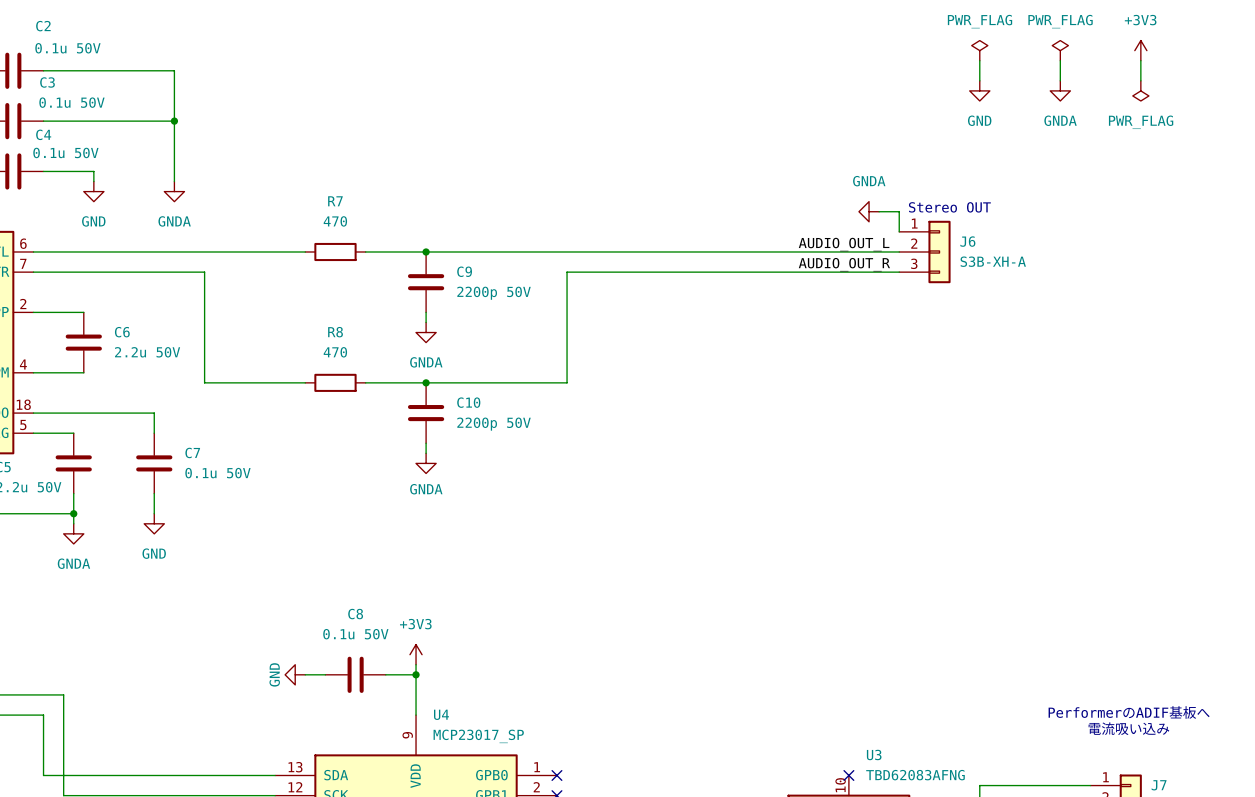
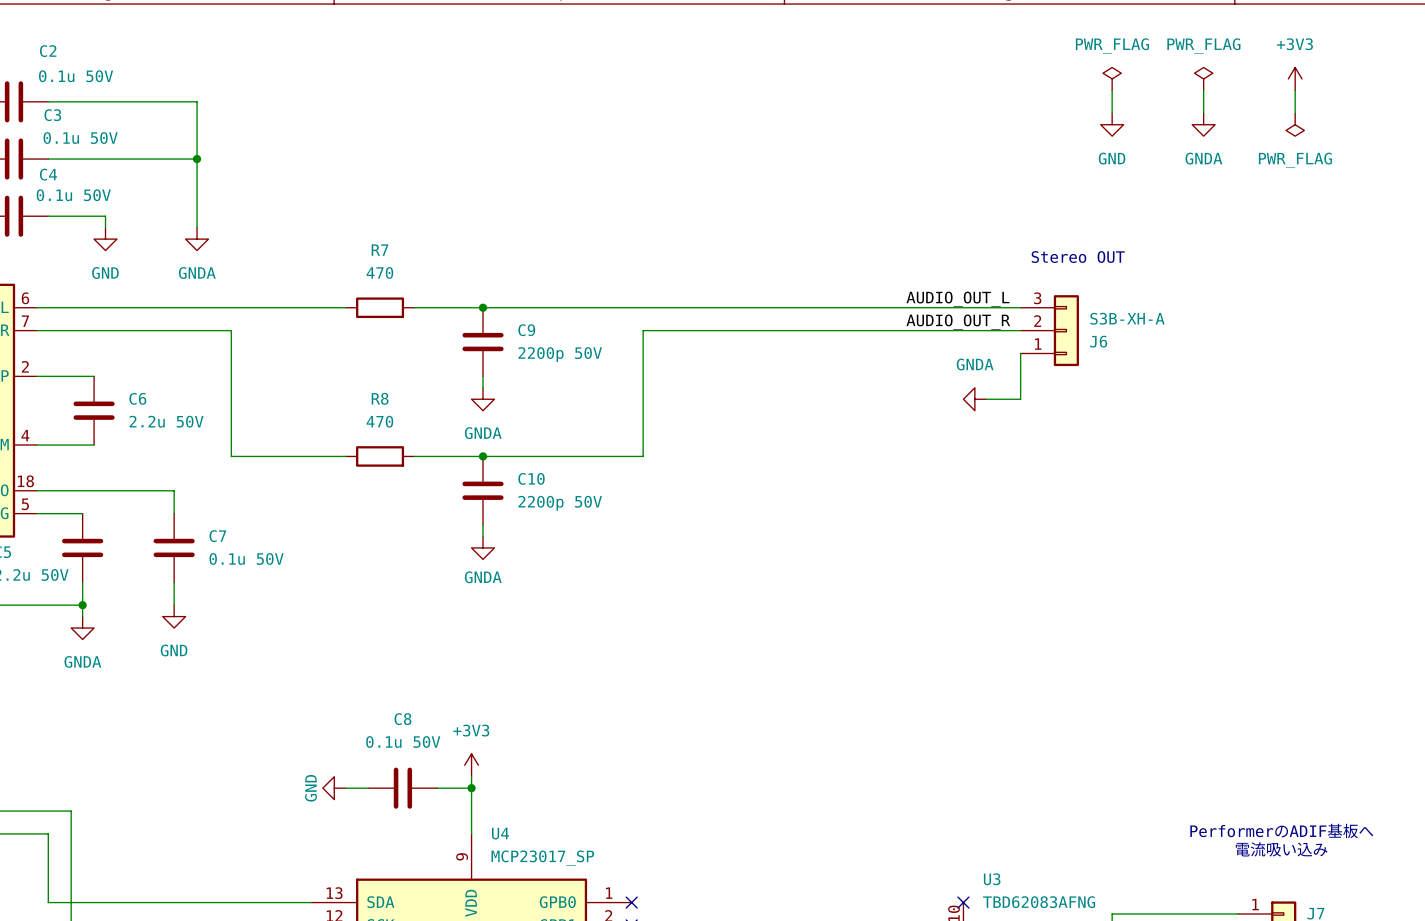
power symbol position: GNDA (869, 211) -> GNDA (974, 399)
wire: (879, 211) (899, 211) (899, 231) -> none
J6 flip: as is (939, 251) -> up-down (1066, 330)
wire: none -> (1020, 353) (1020, 399) (986, 399)

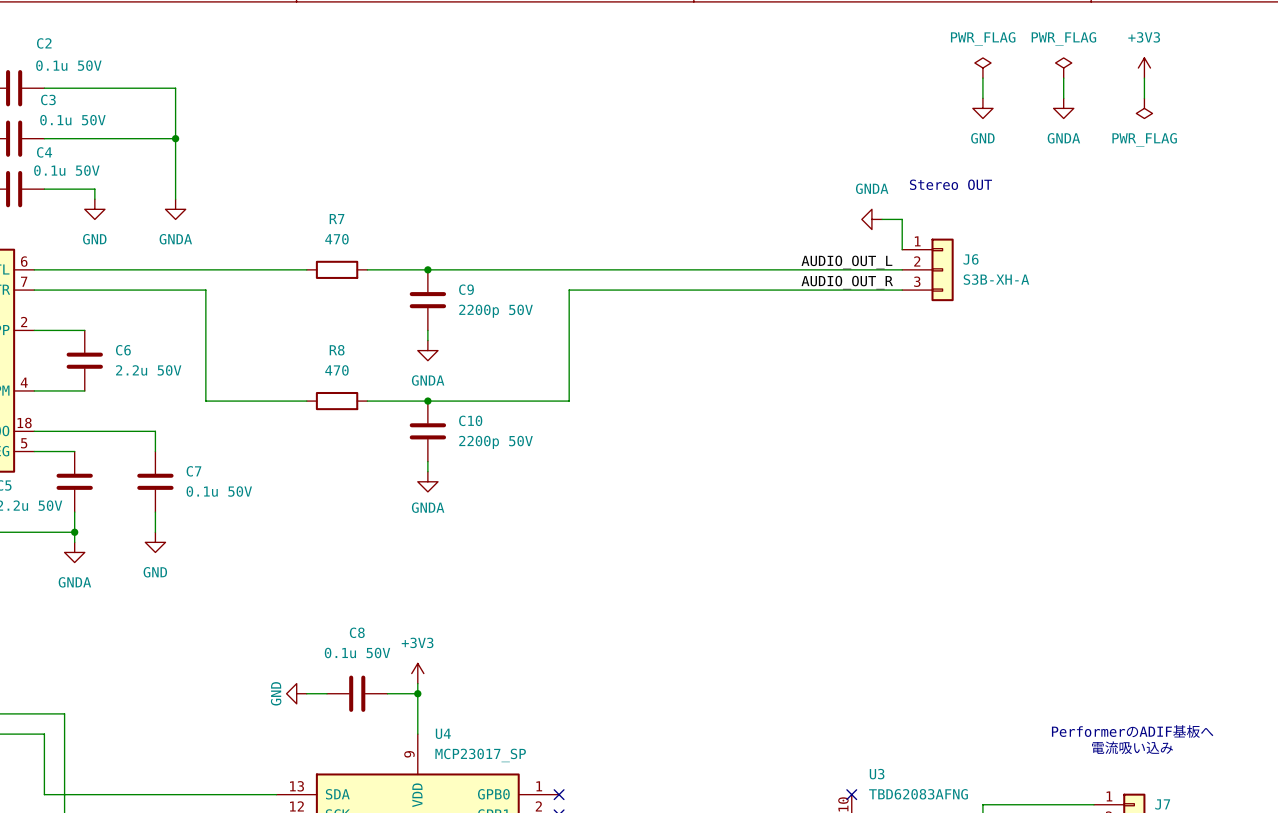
wire: none -> (882, 219) (902, 219) (902, 249)
text position: Stereo OUT (1078, 257) -> Stereo OUT (950, 184)
J6 flip: as is (1066, 330) -> up-down (942, 269)
wire: (1020, 353) (1020, 399) (986, 399) -> none
power symbol position: GNDA (974, 399) -> GNDA (871, 219)

